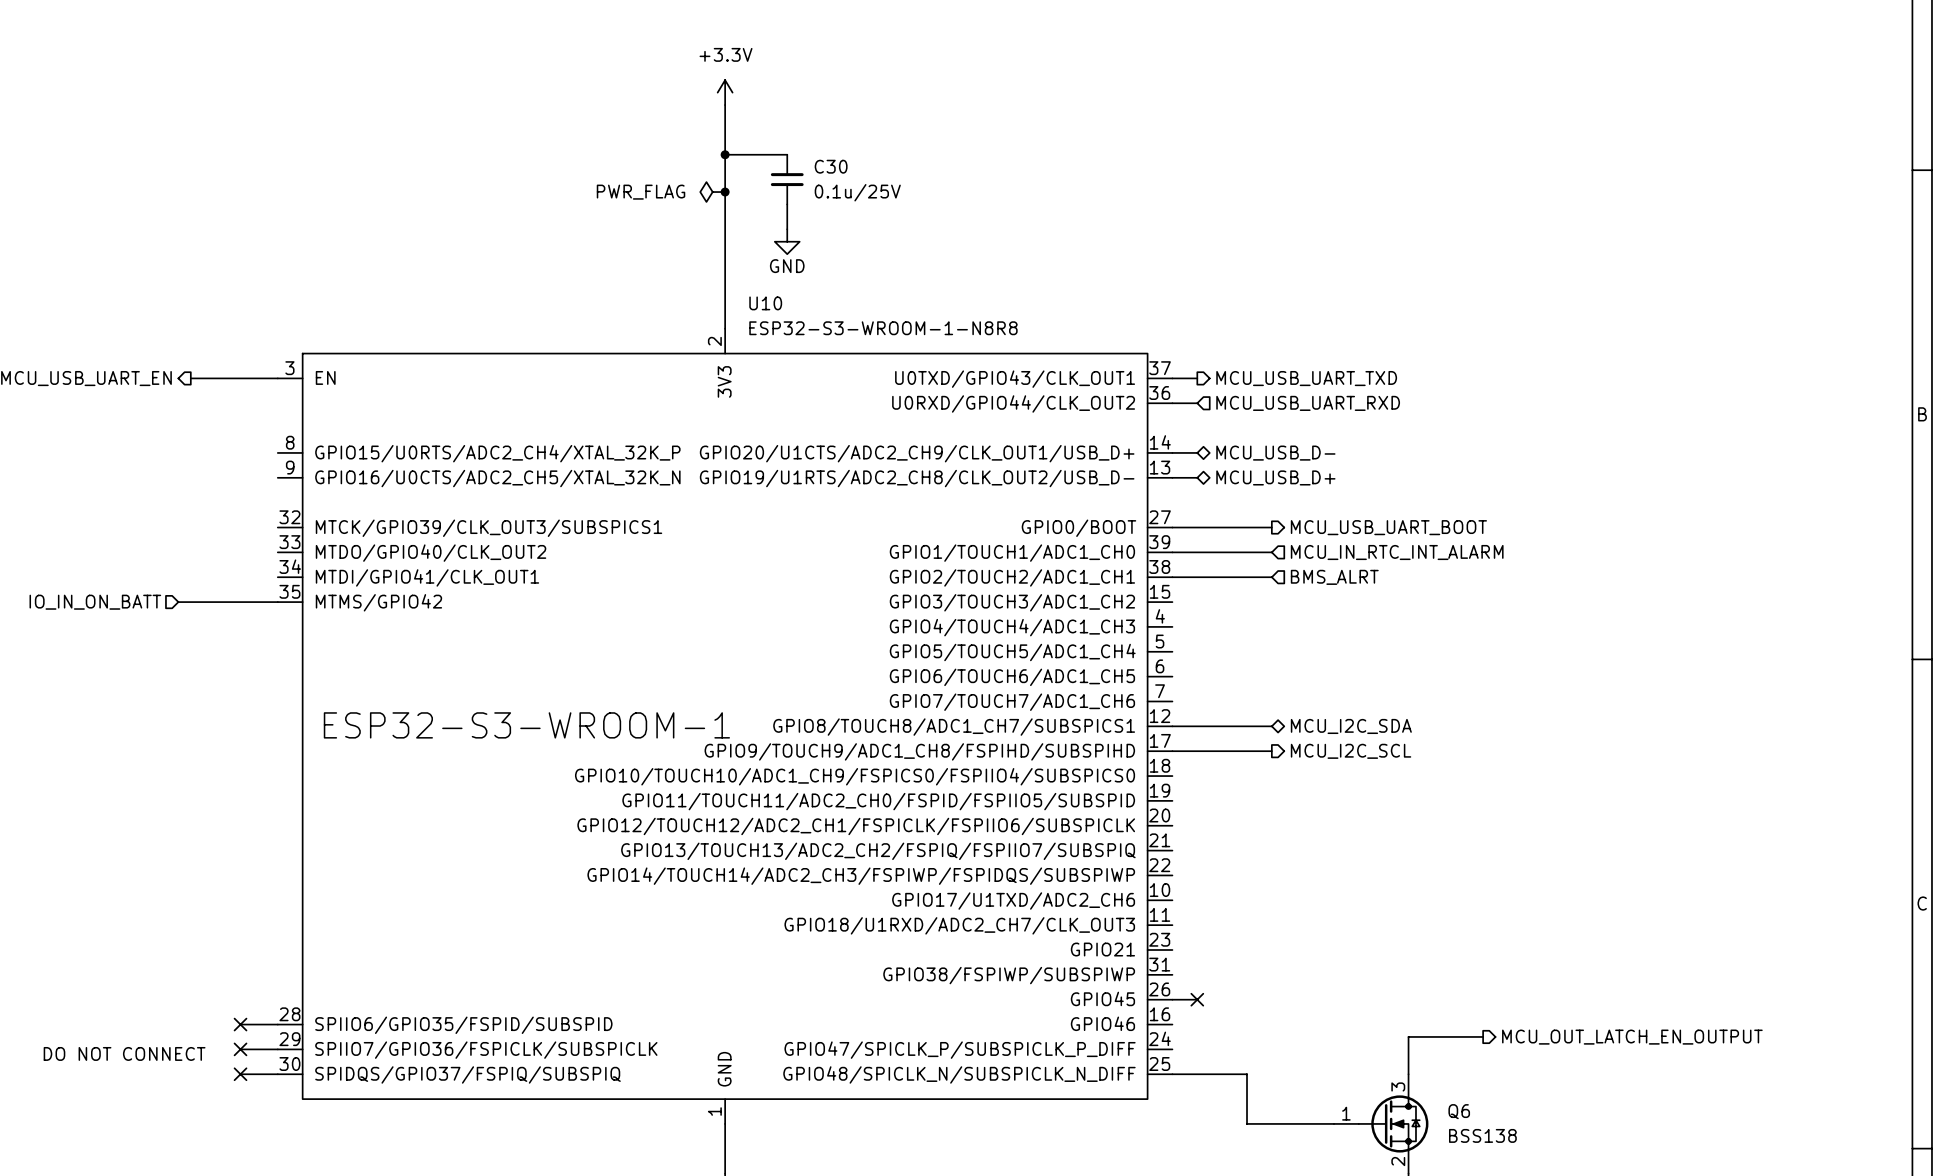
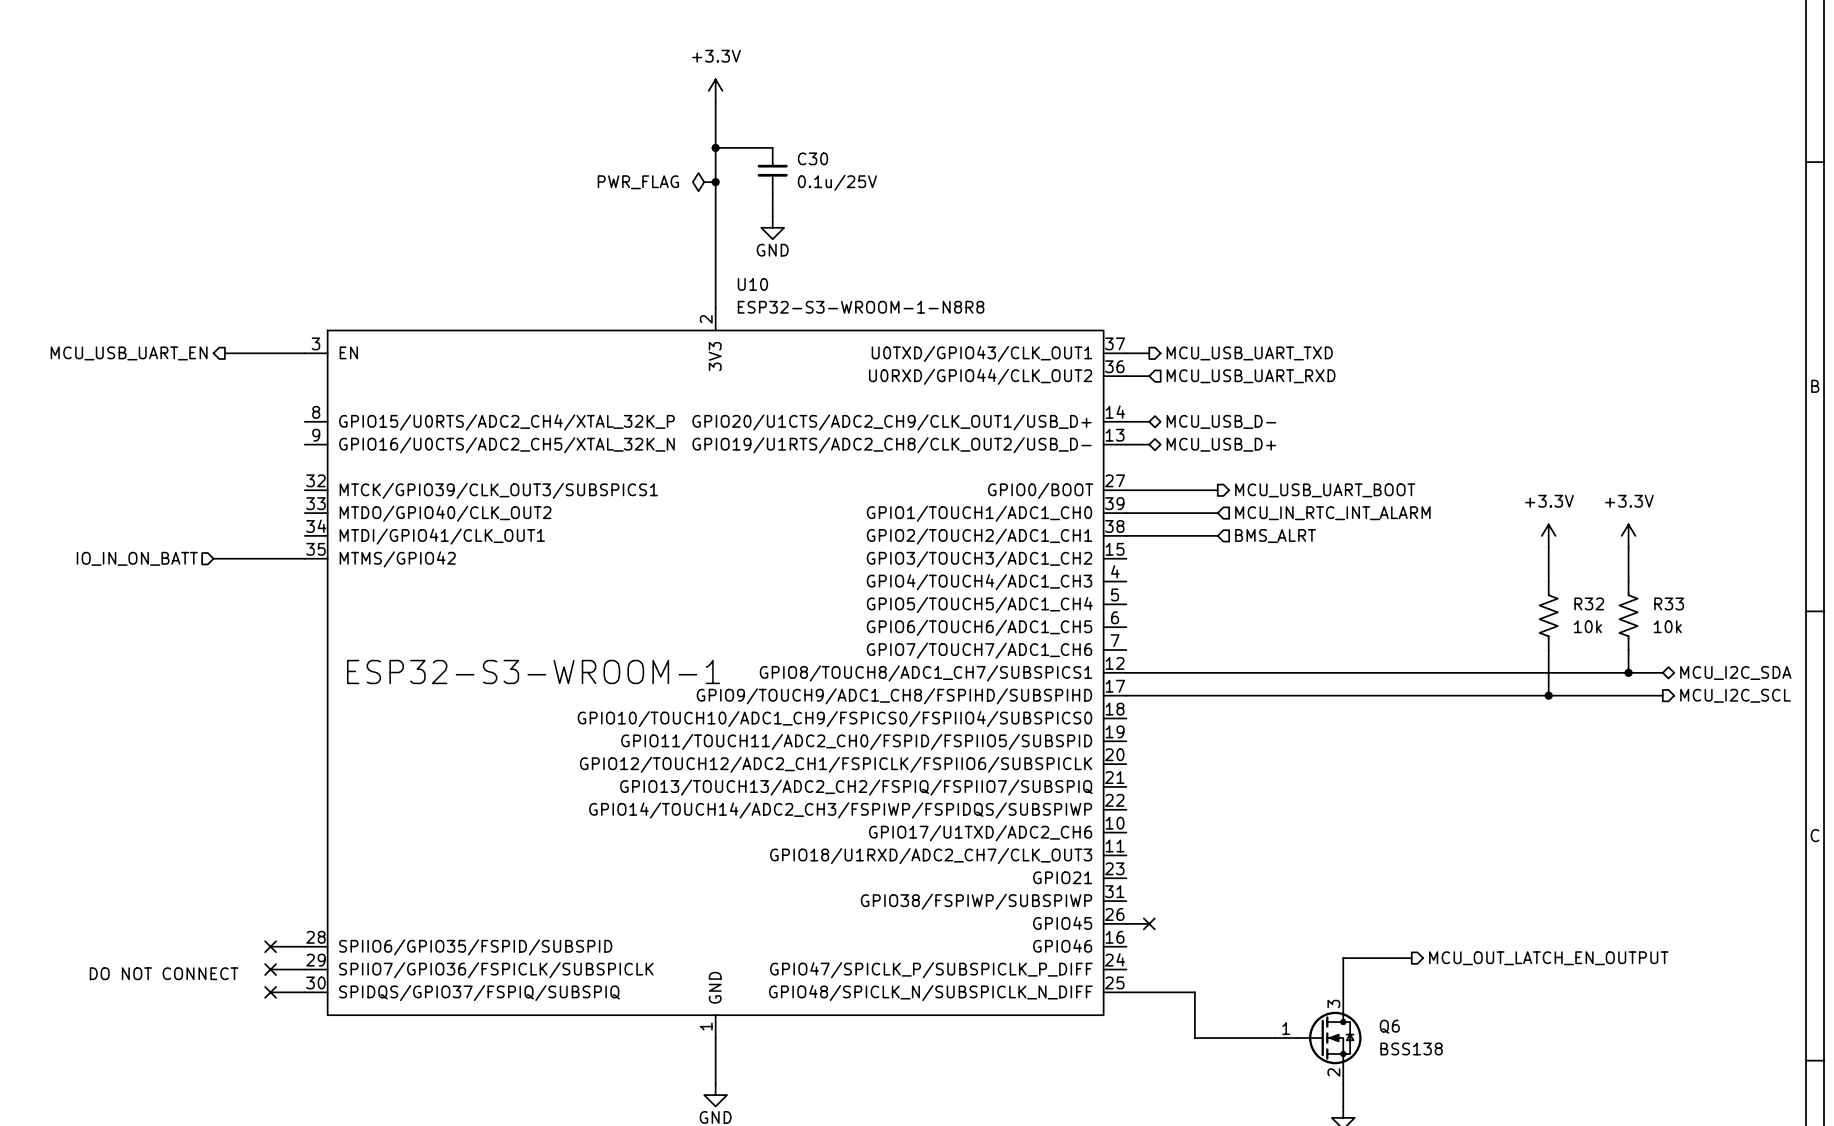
power symbol: none -> +3.3V (1548, 535)
power symbol: none -> +3.3V (1628, 535)
wire: none -> (1548, 547) (1548, 581)
wire: none -> (1628, 547) (1628, 581)
R32: none -> 10k (1548, 615)
R33: none -> 10k (1628, 615)
wire: none -> (1548, 650) (1548, 695)
wire: none -> (1628, 650) (1628, 672)
wire: none -> (1217, 672) (1662, 672)
hierarchical label: MCU_I2C_SDA (1351, 726) -> none
junction: none -> (1628, 672)
hierarchical label: none -> MCU_I2C_SDA (1735, 672)
wire: none -> (1217, 695) (1662, 695)
hierarchical label: MCU_I2C_SCL (1351, 751) -> none
junction: none -> (1548, 695)
hierarchical label: none -> MCU_I2C_SCL (1735, 695)

